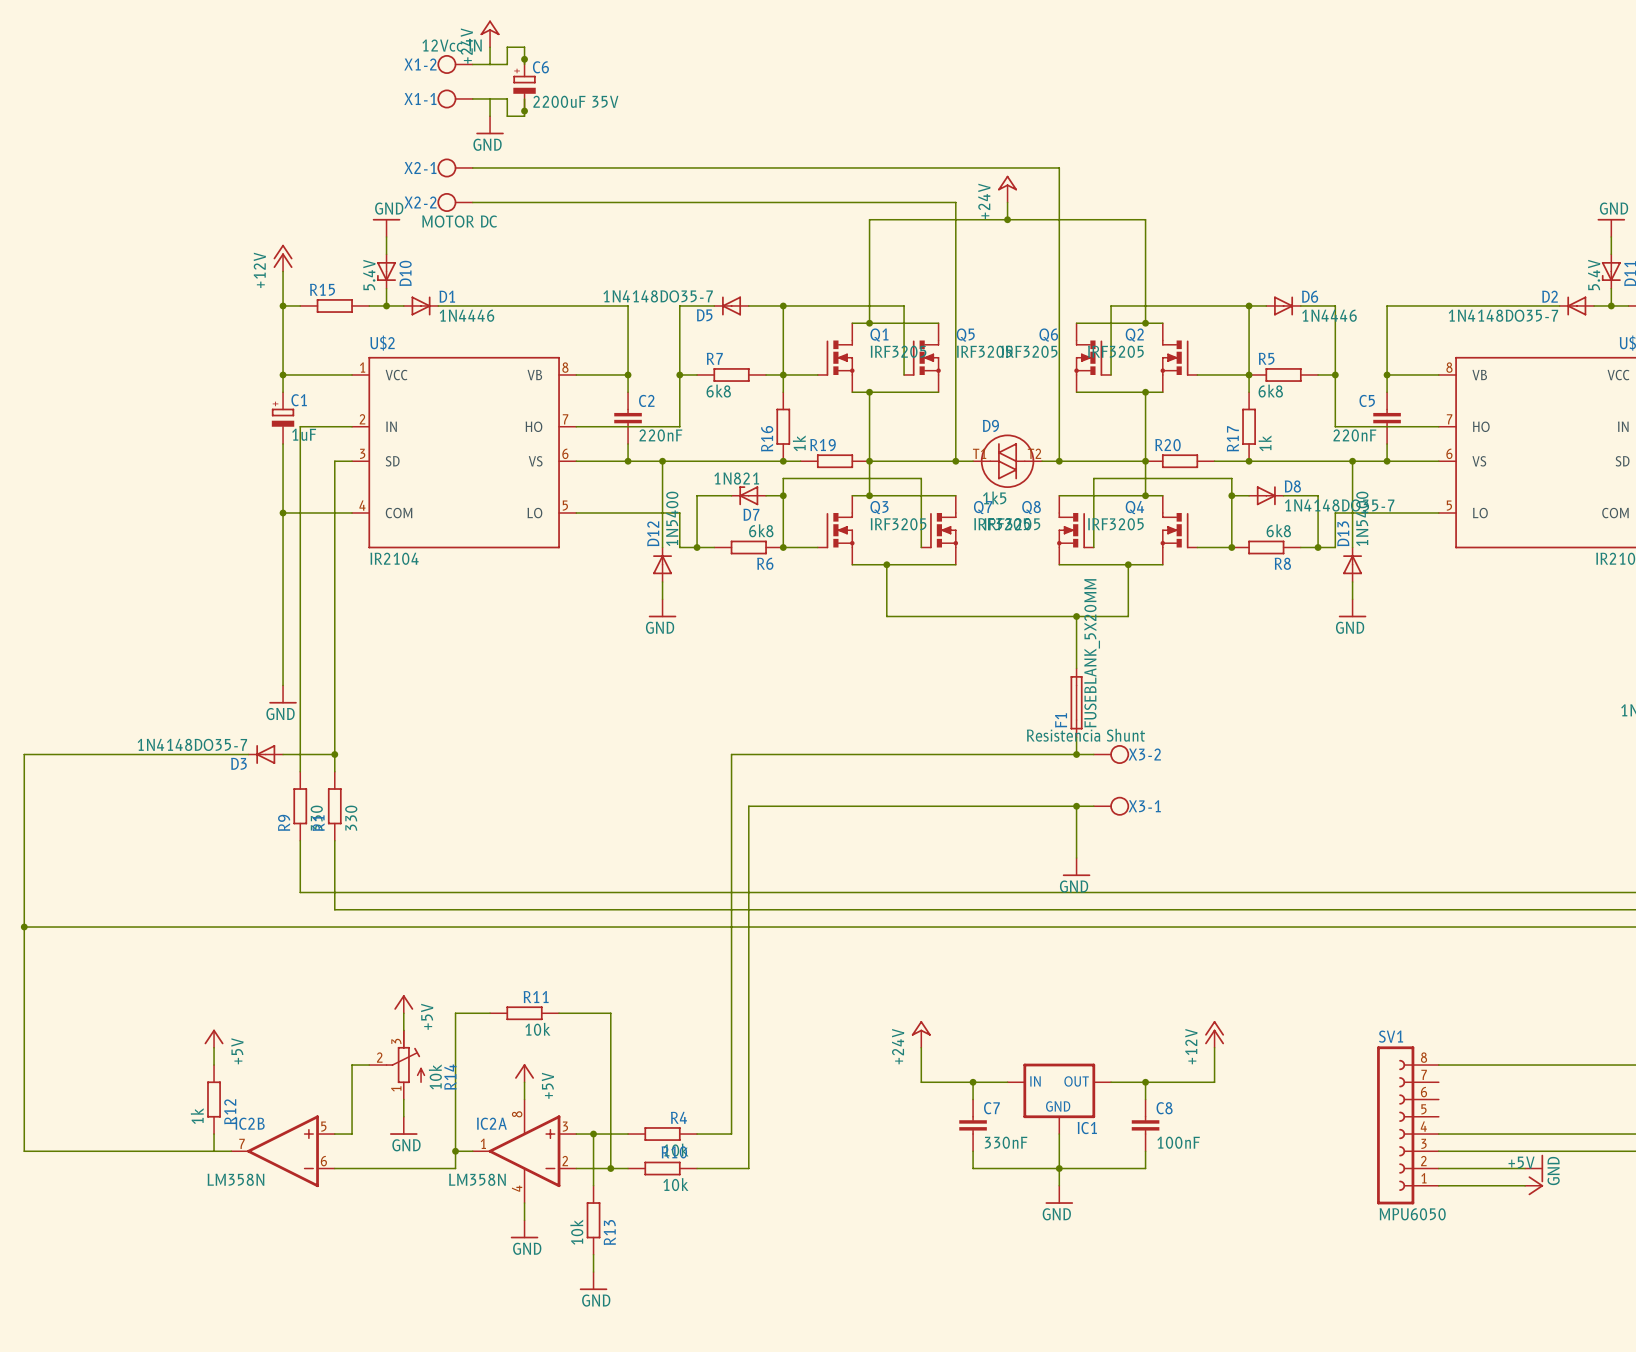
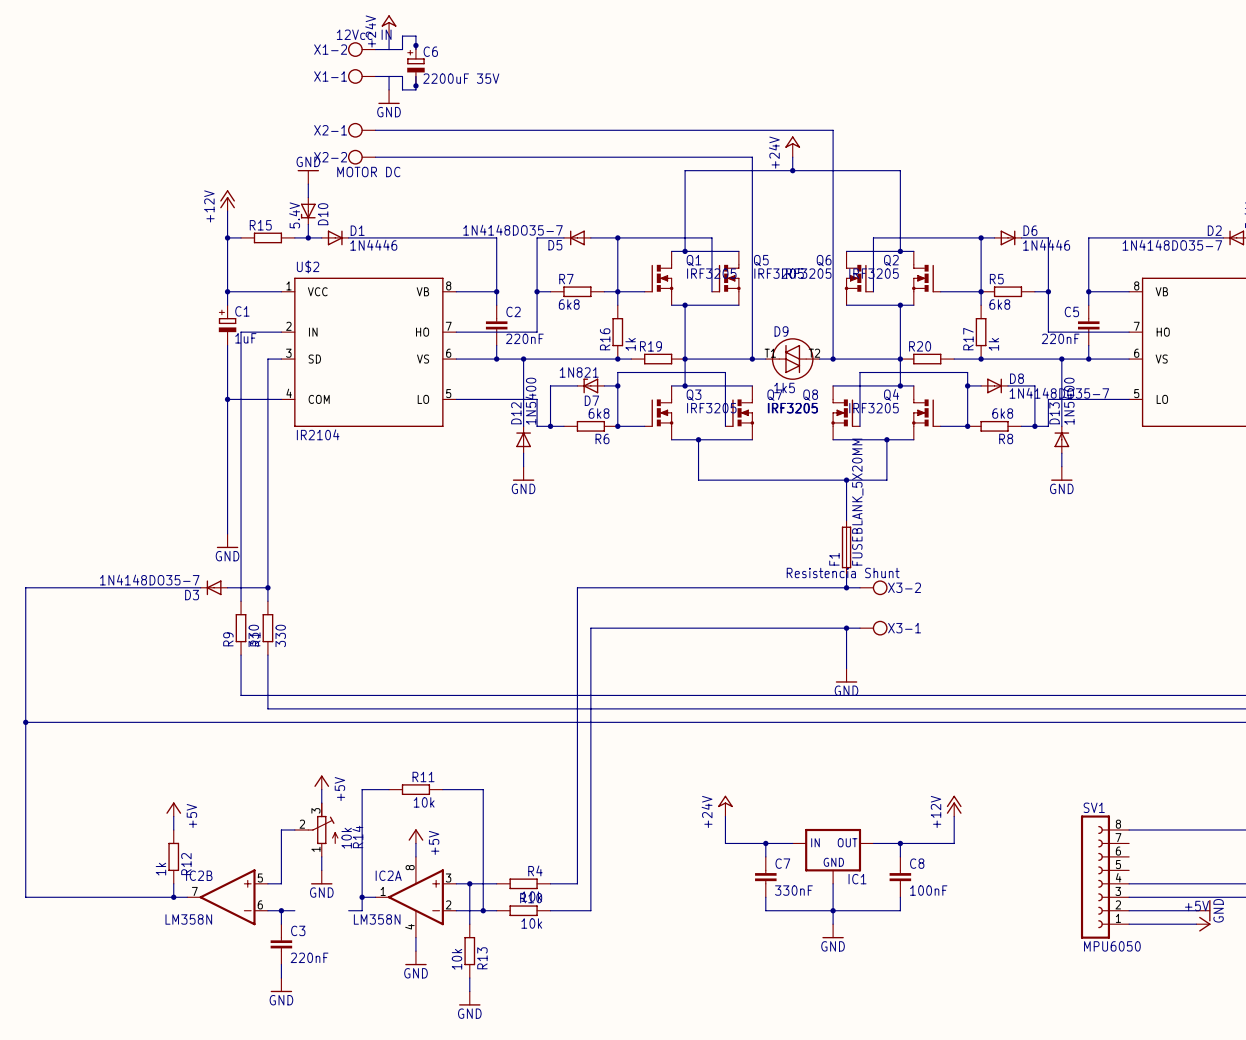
junction: none -> (173, 897)
wire: none -> (281, 910) (281, 924)
junction: none -> (281, 910)
wire: (369, 1168) (438, 1168) -> none
C3: none -> 220nF (281, 944)
wire: none -> (281, 964) (281, 978)
power symbol: none -> GND (281, 985)

